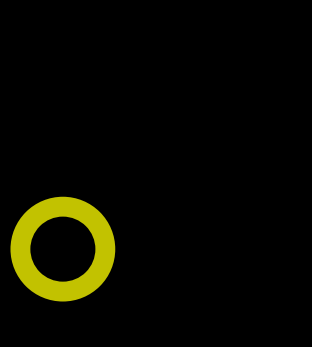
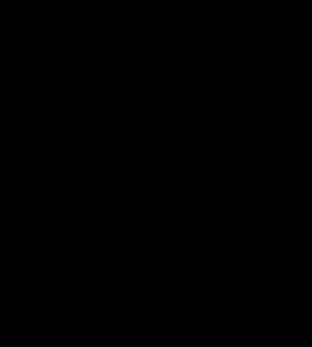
part: (62, 249) -> none

